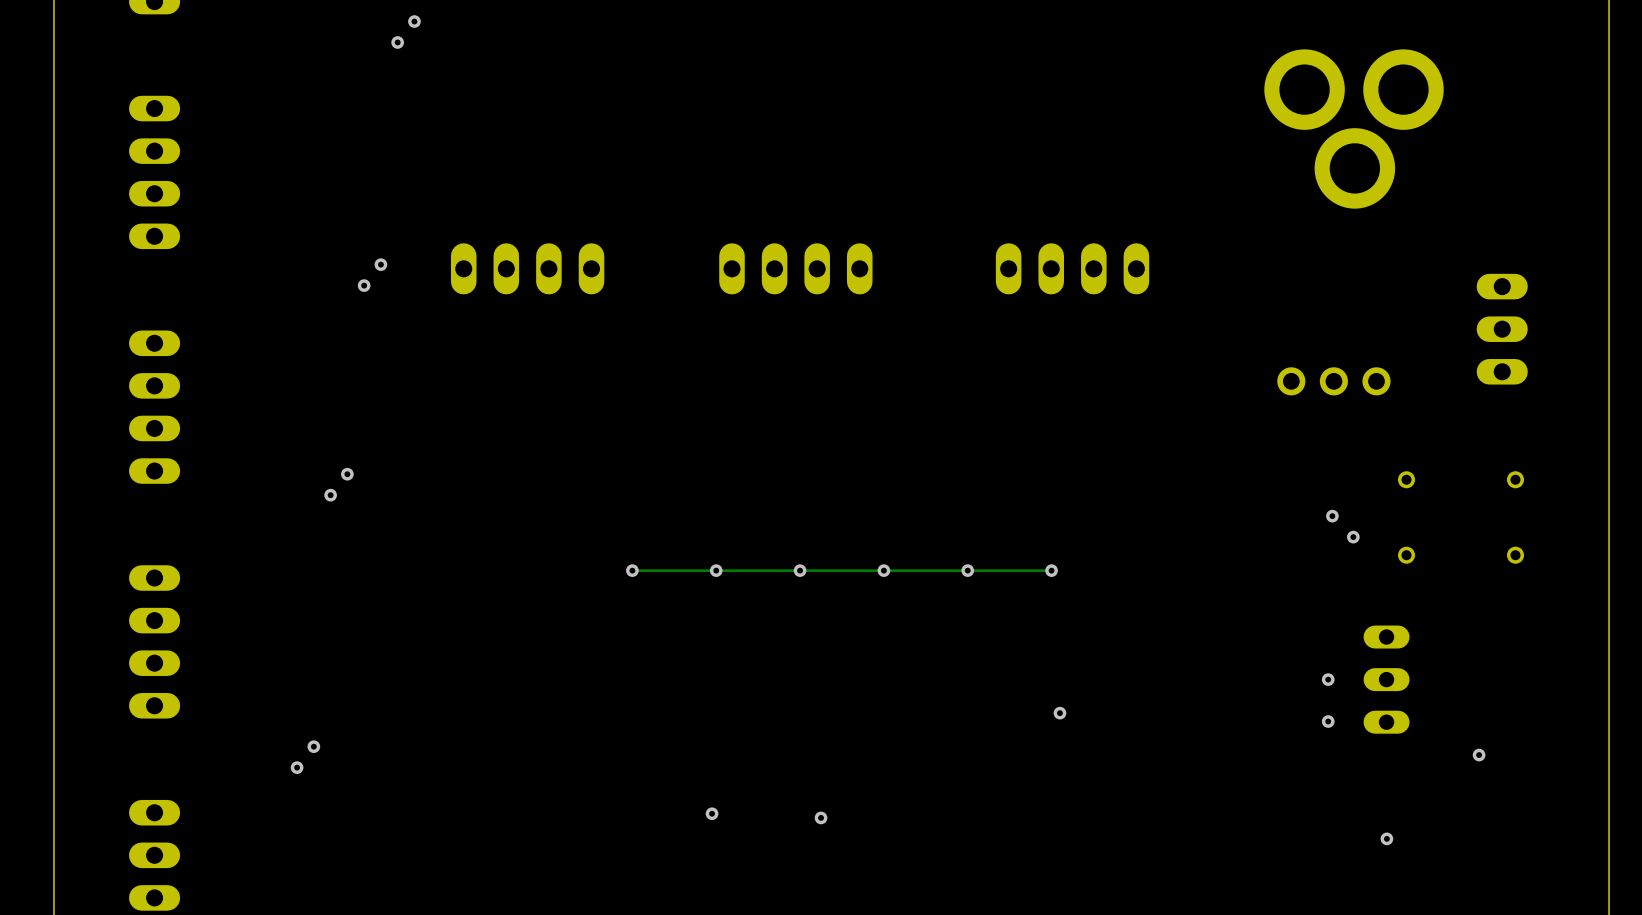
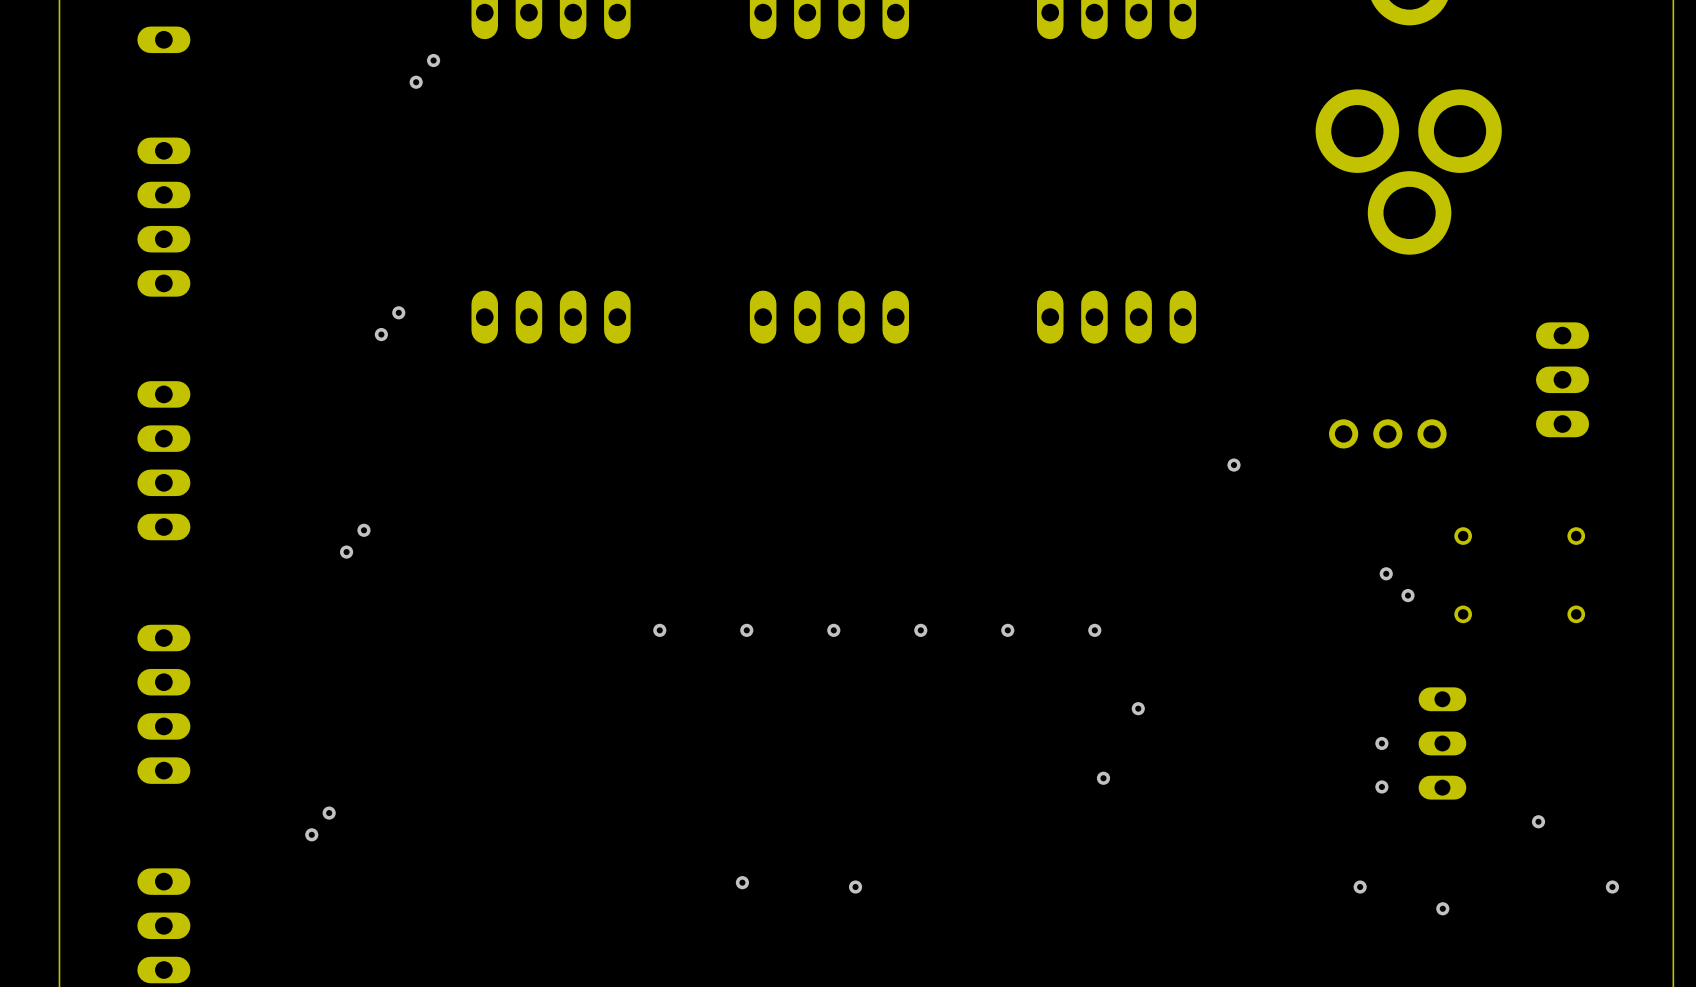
via: none -> (1233, 465)
track: (1051, 570) (632, 570) -> none
via: none -> (1138, 708)
via: none -> (1360, 887)
via: none -> (1612, 887)

